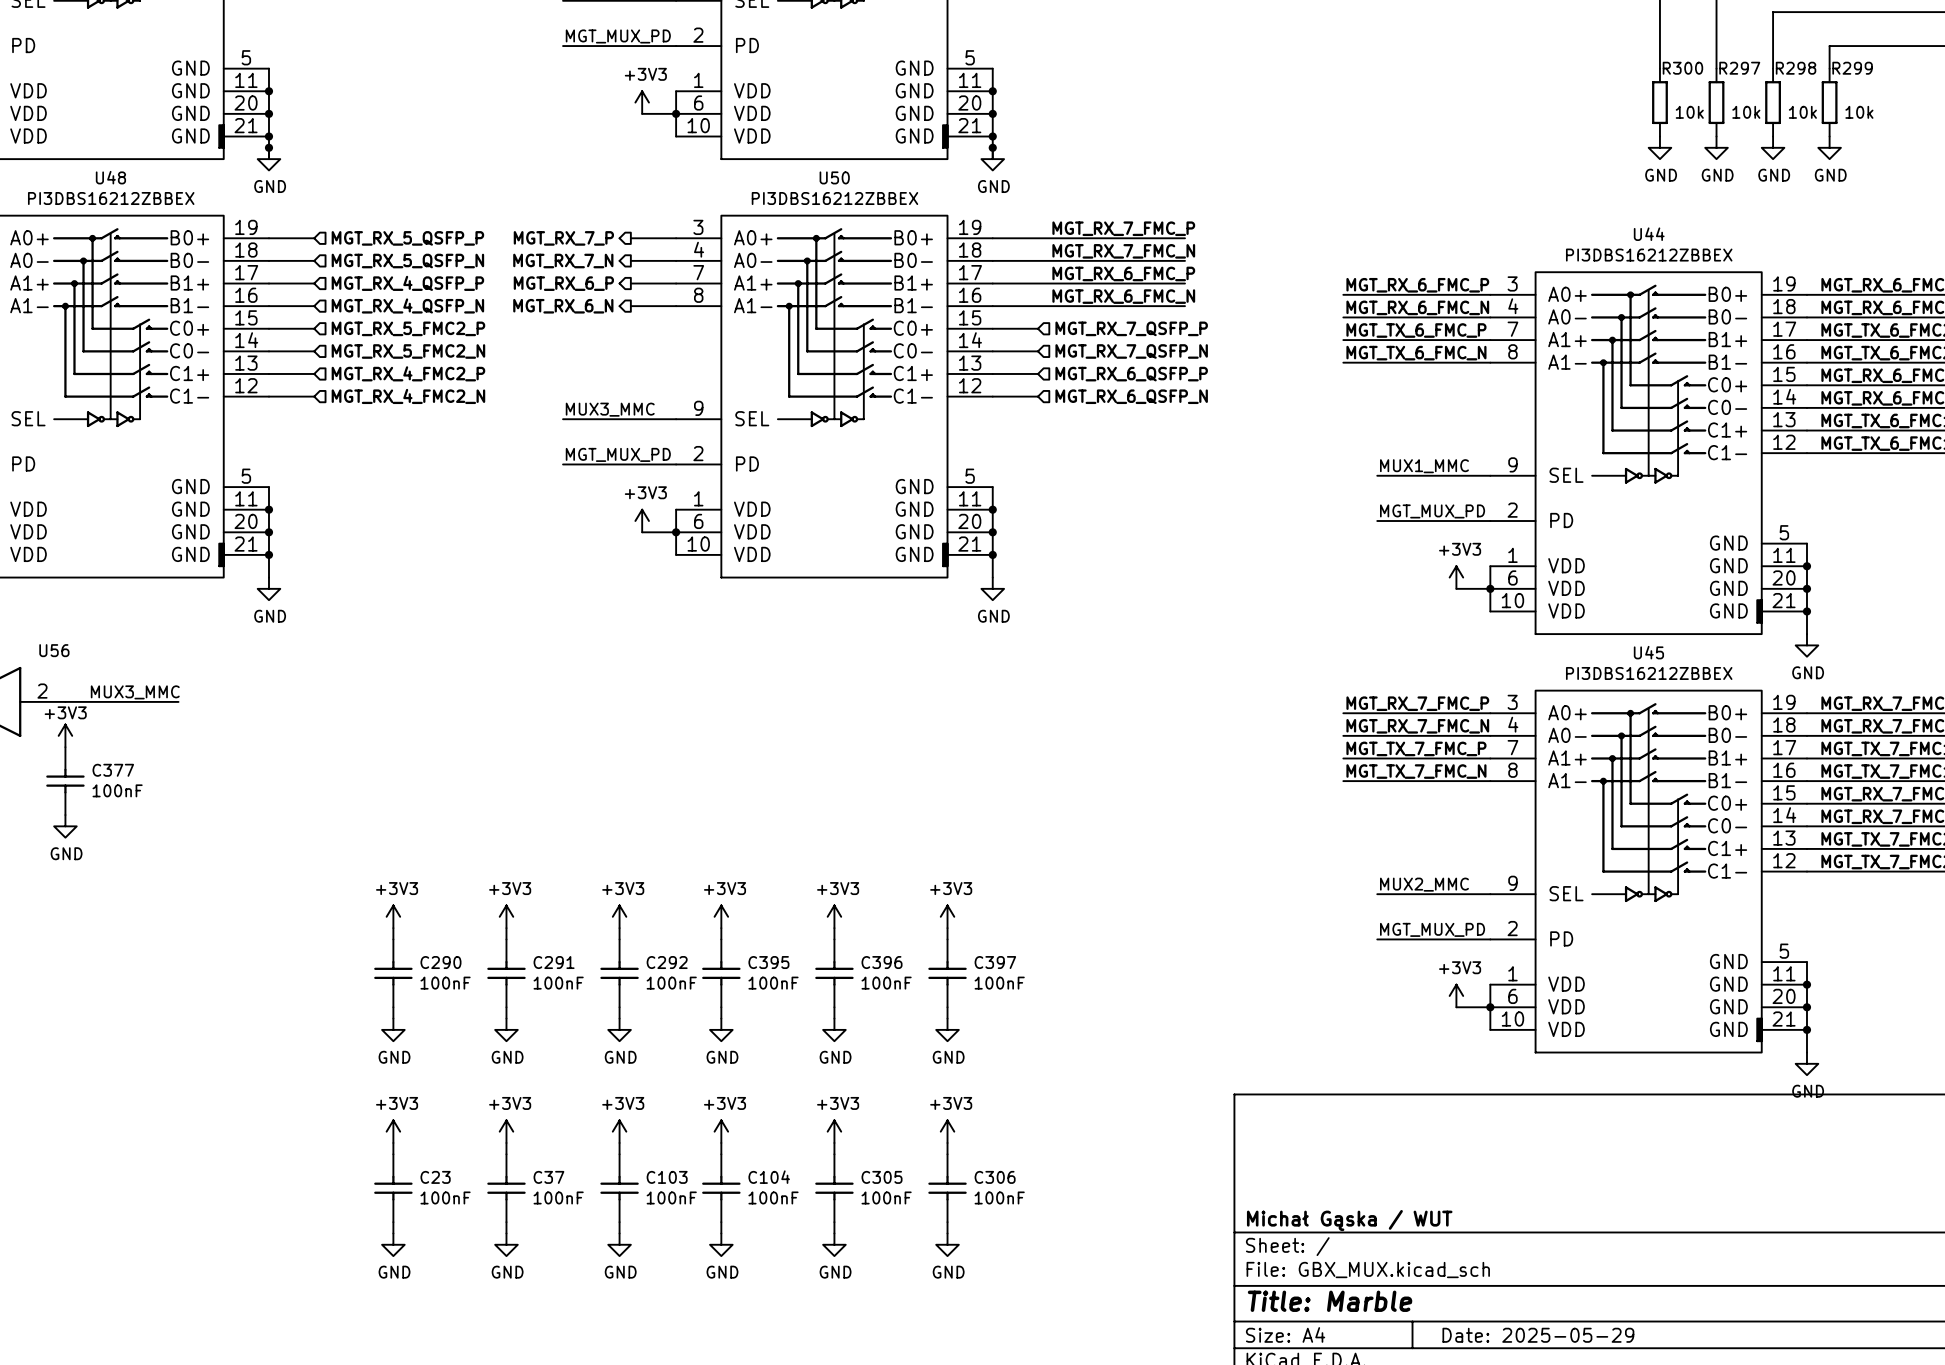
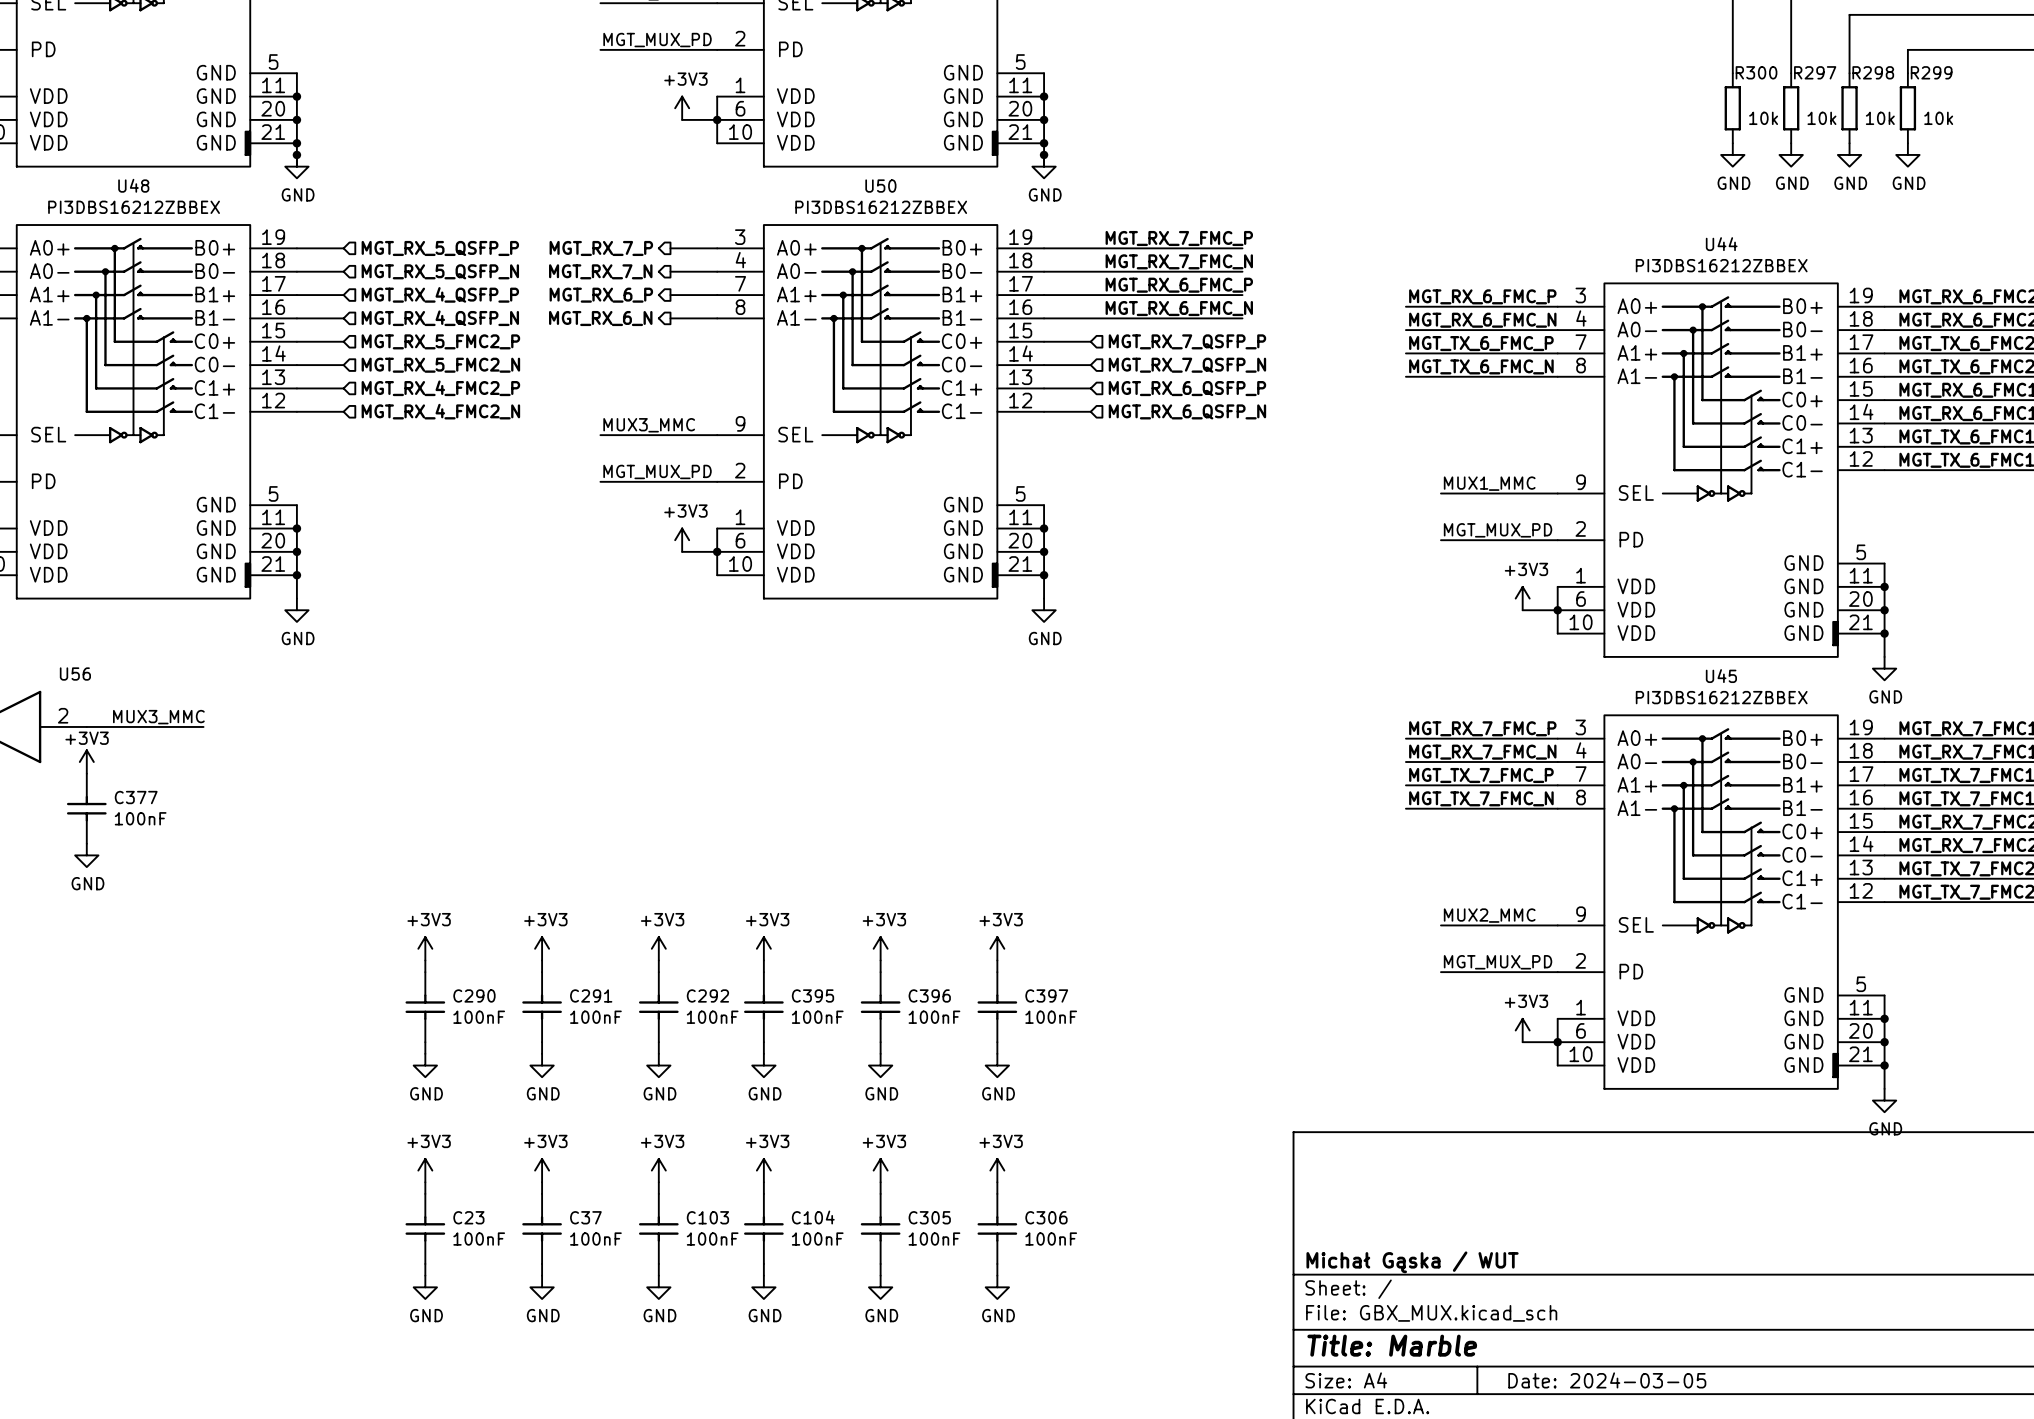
title block: Date: 2025-05-29 (1538, 1335) -> Date: 2024-03-05 (1607, 1380)

